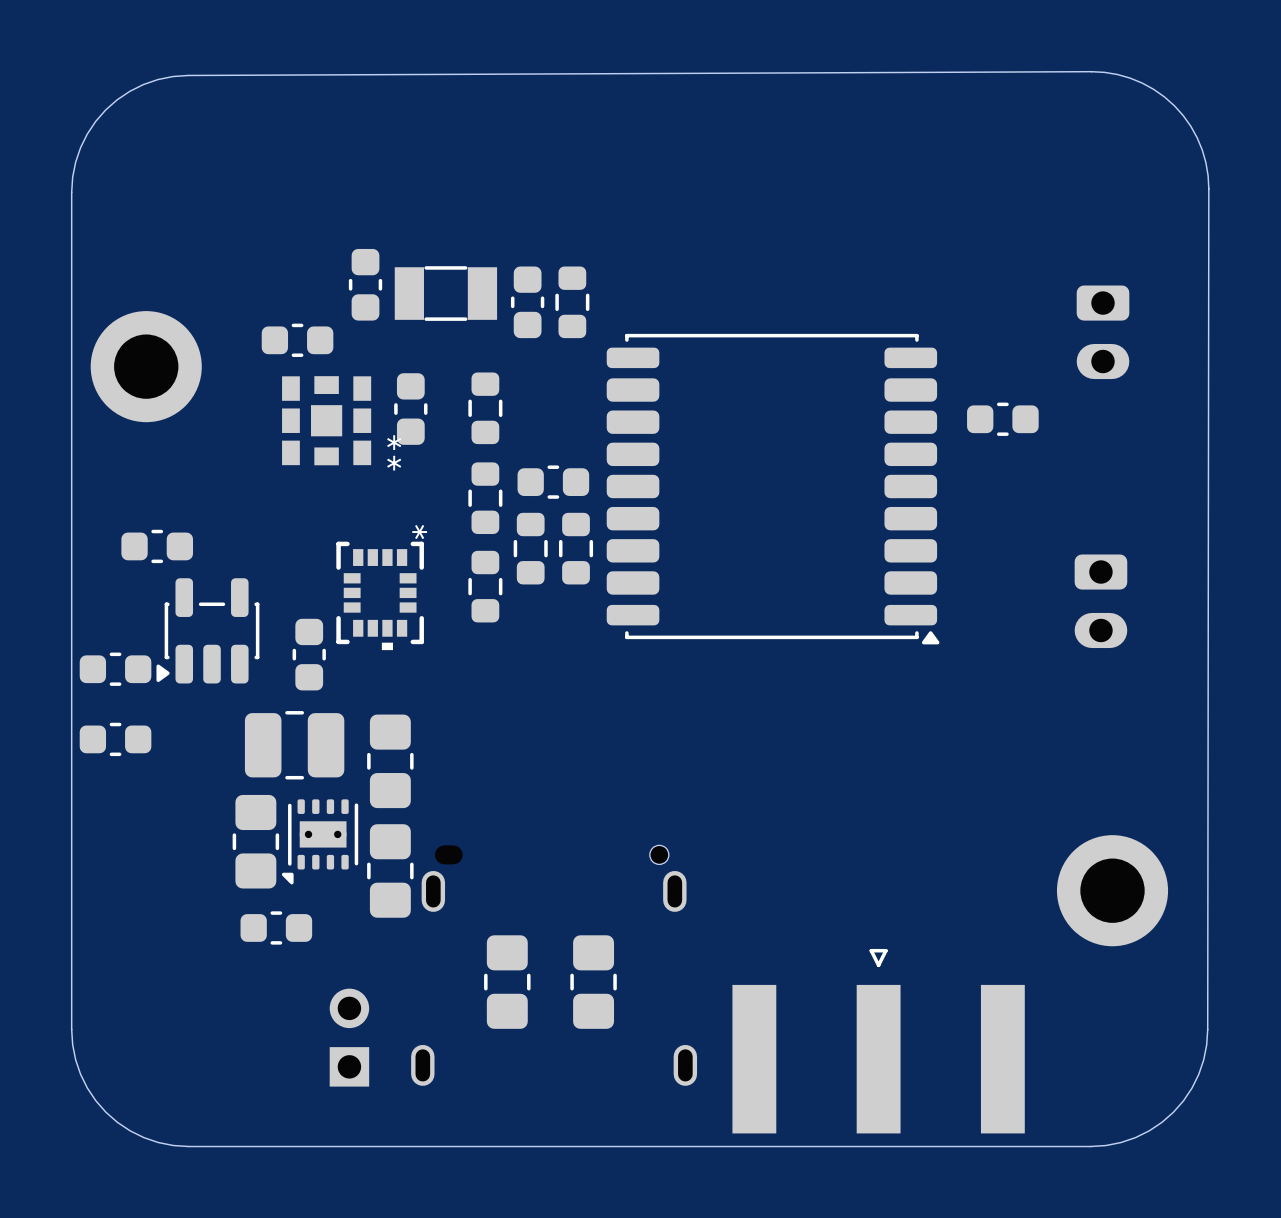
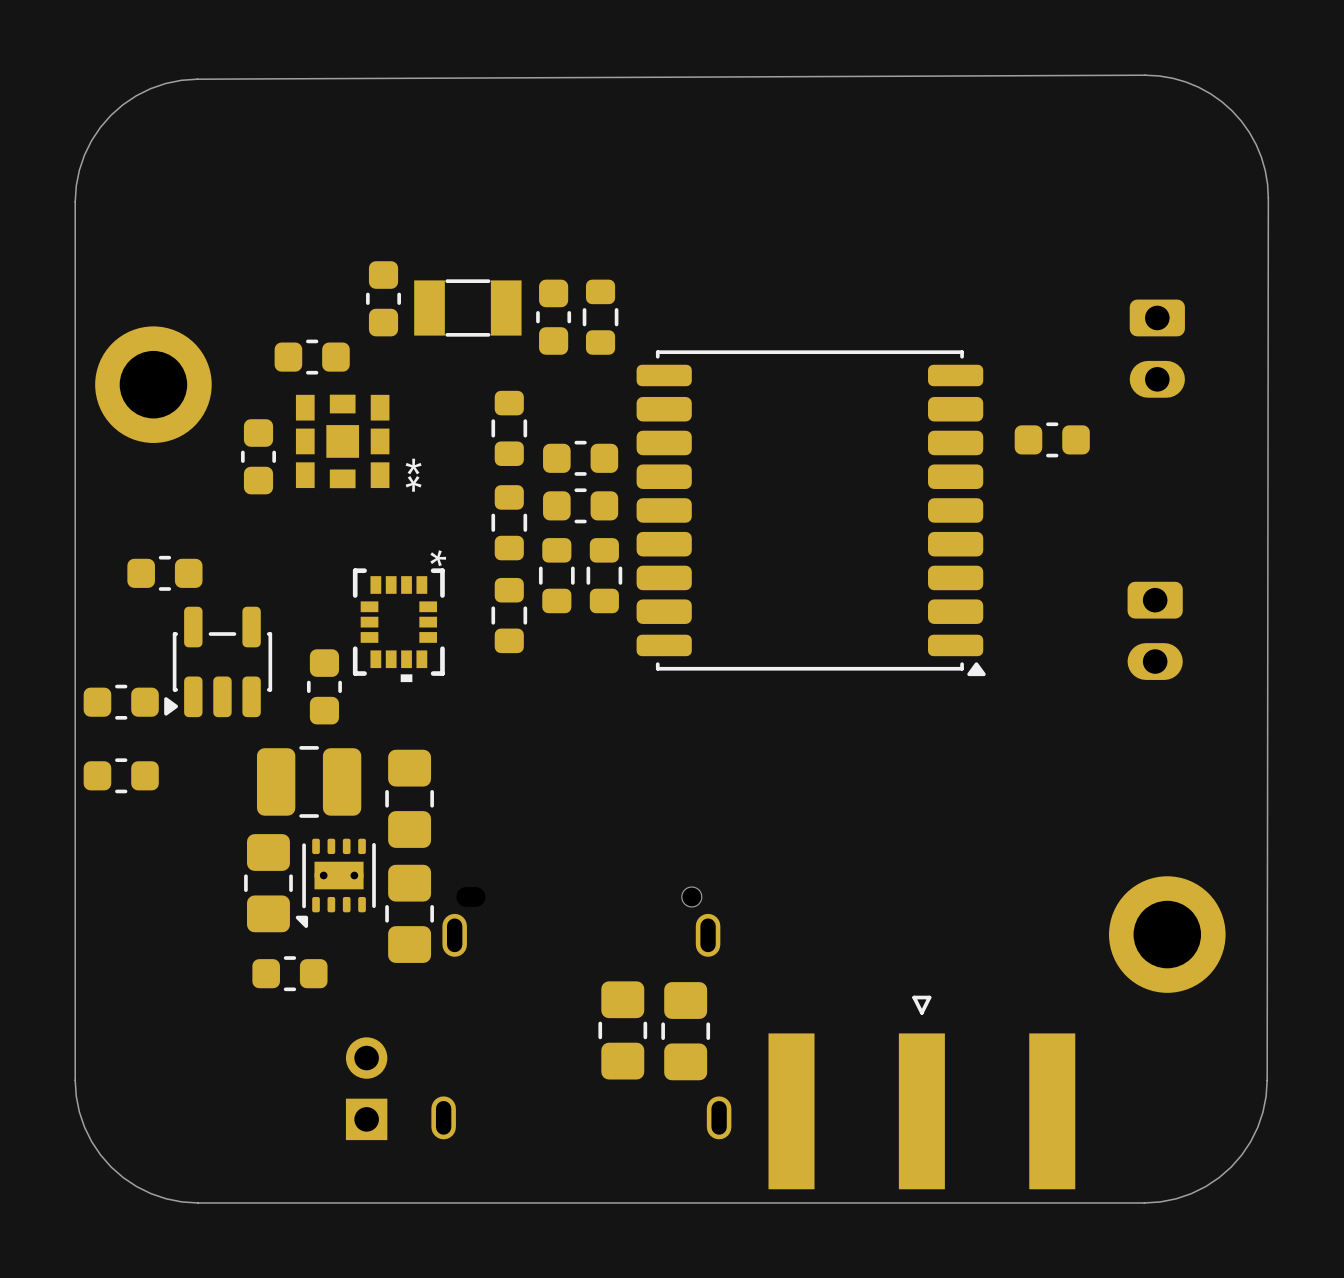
part: (410, 409) -> none
part: none -> (258, 456)
part: none -> (580, 458)
part position: (507, 982) -> (685, 1031)

